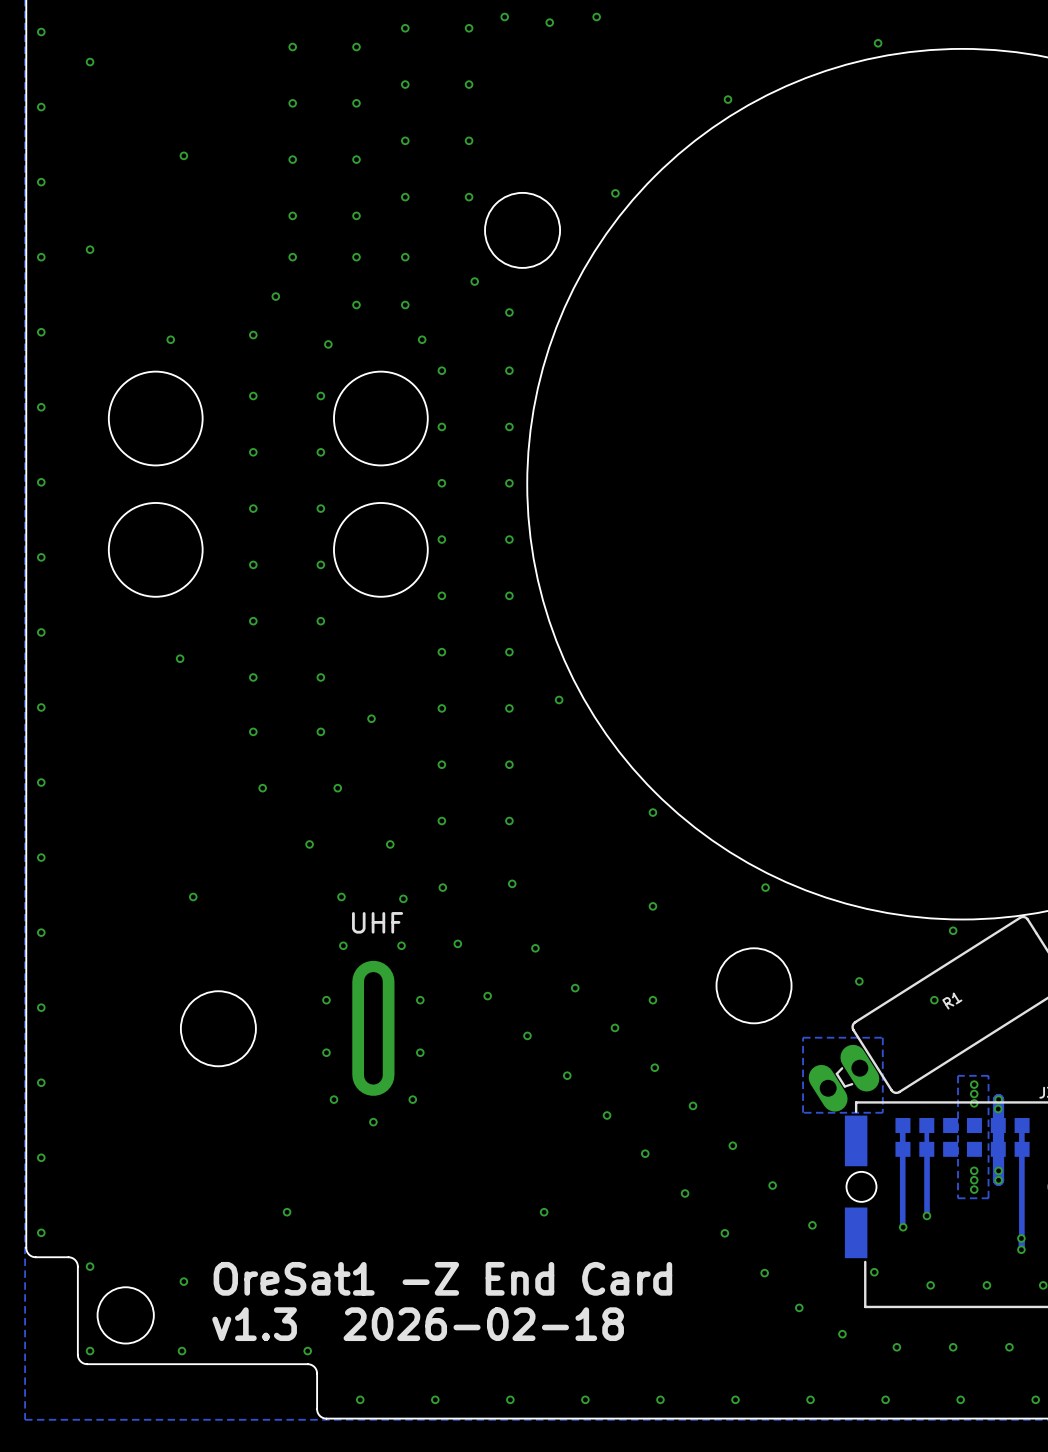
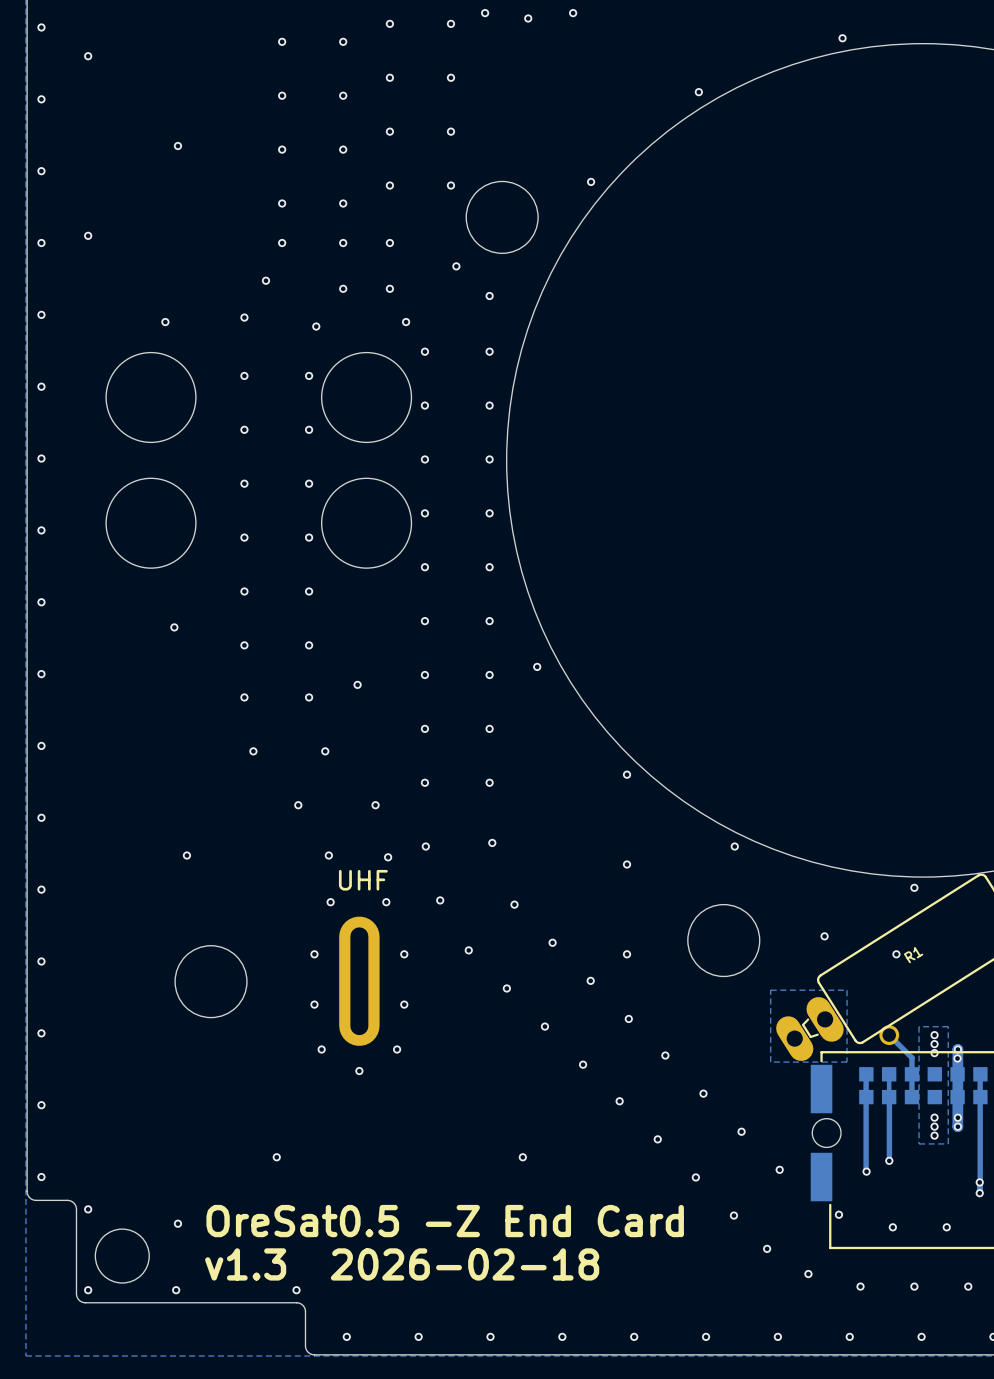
track: none -> (889, 1035) (911, 1057) (911, 1097)
part: none -> (889, 1035)
text: OreSat1 -Z End Card (442, 1278) -> OreSat0.5 -Z End Card (445, 1221)

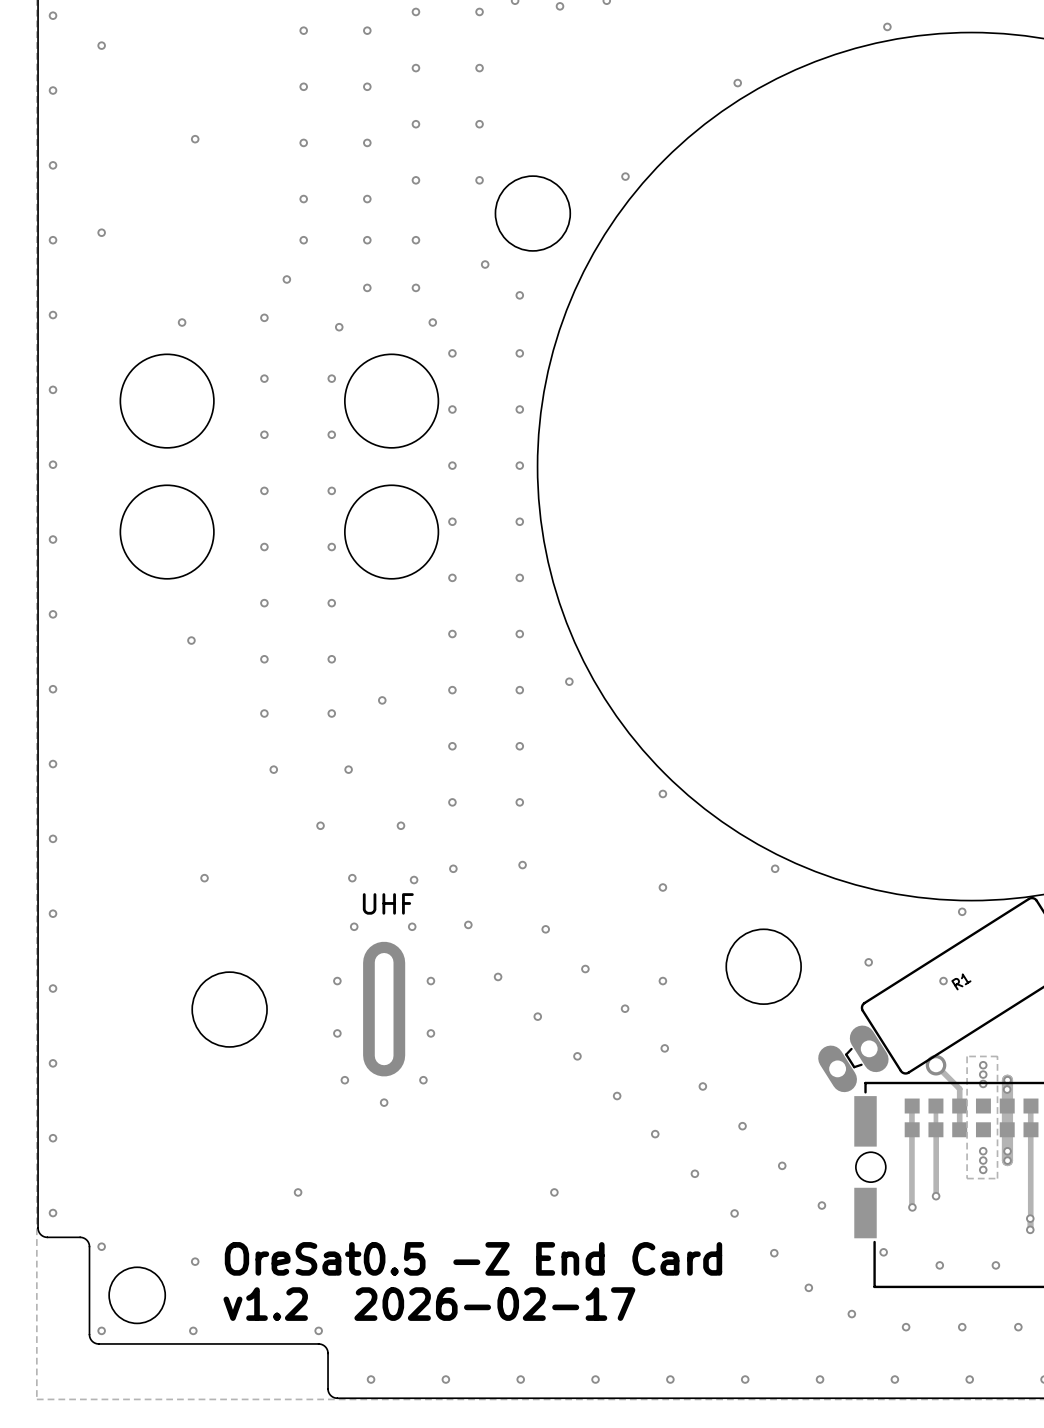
zone outline: (847, 990) (770, 990) (770, 1062) (847, 1062) (847, 990) -> none
text: v1.3 2026-02-18 (402, 1264) -> v1.2 2026-02-17 (429, 1304)

